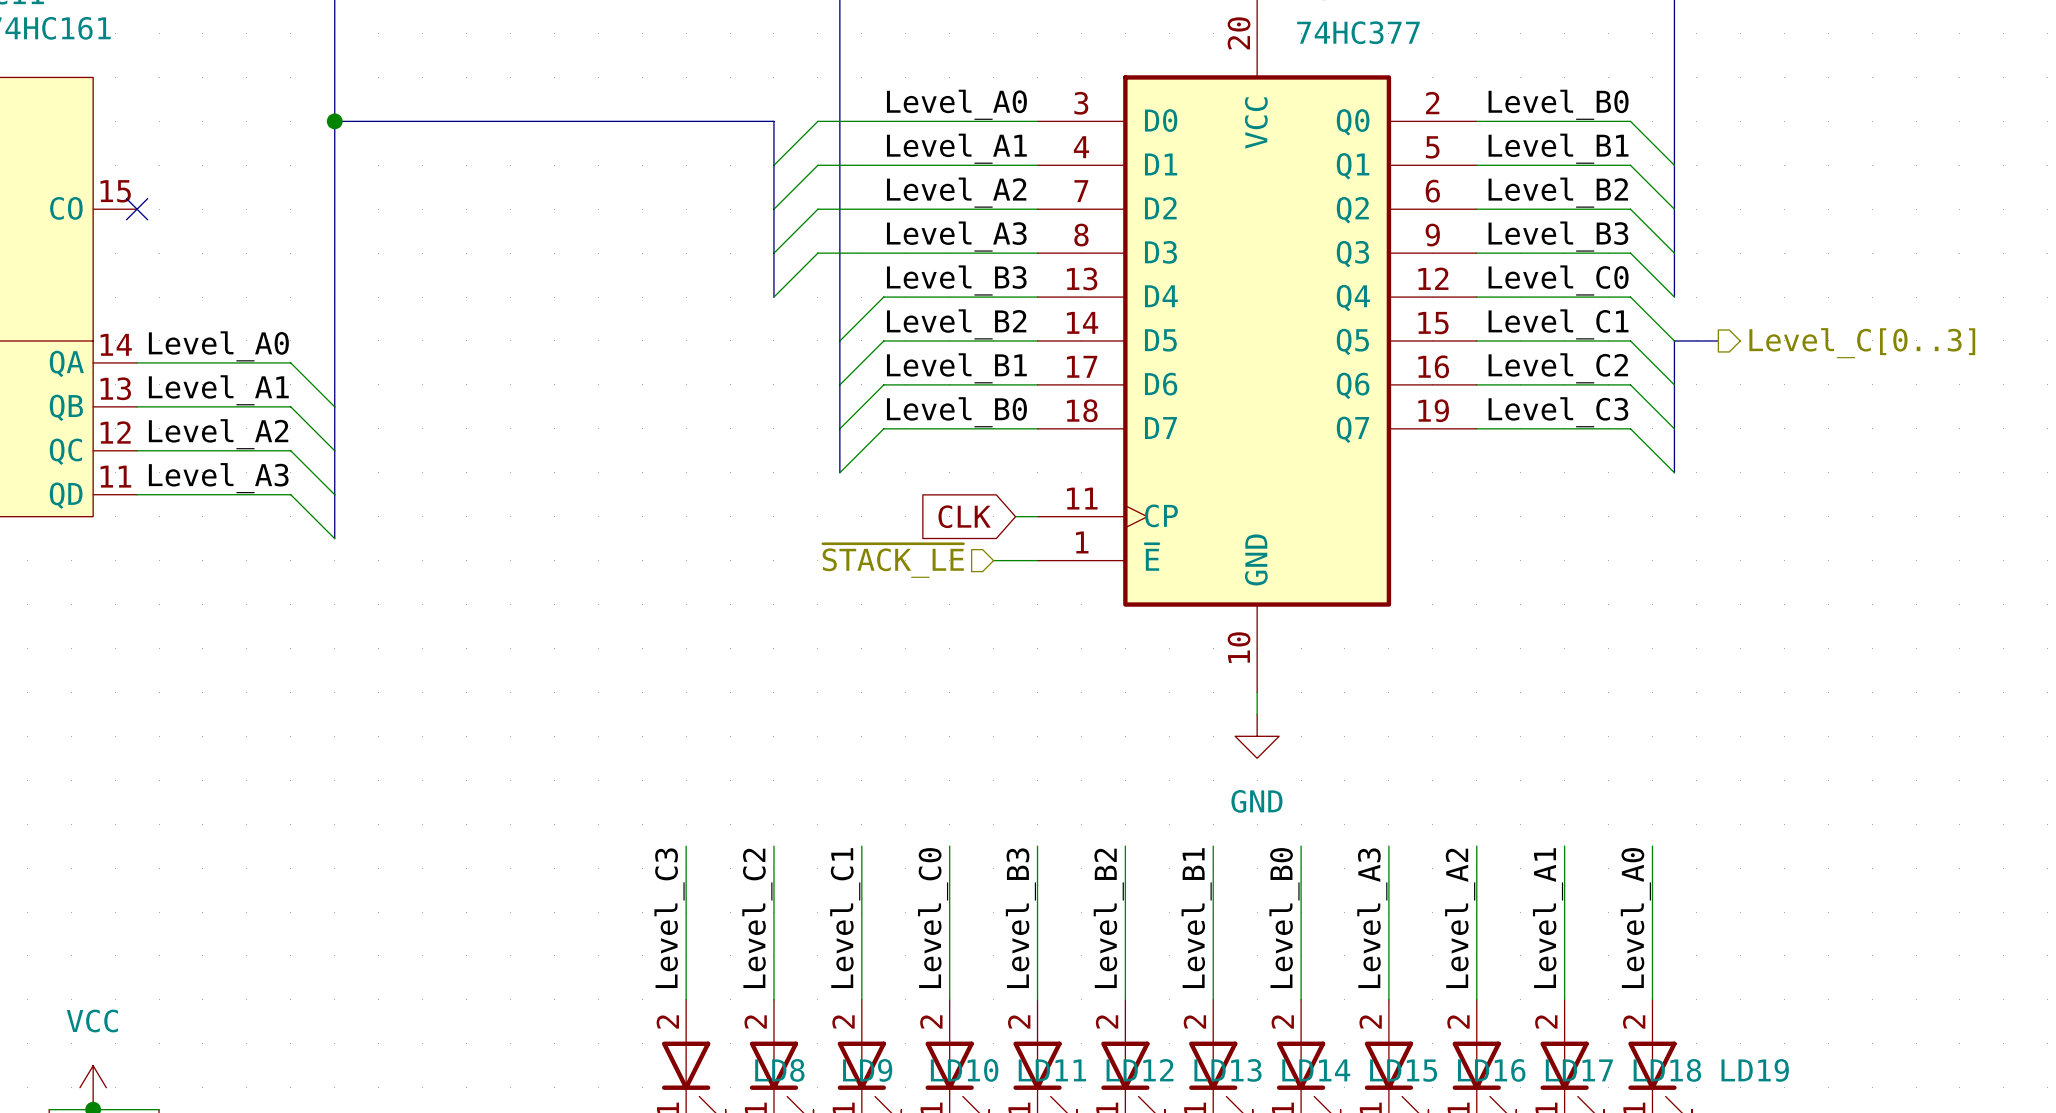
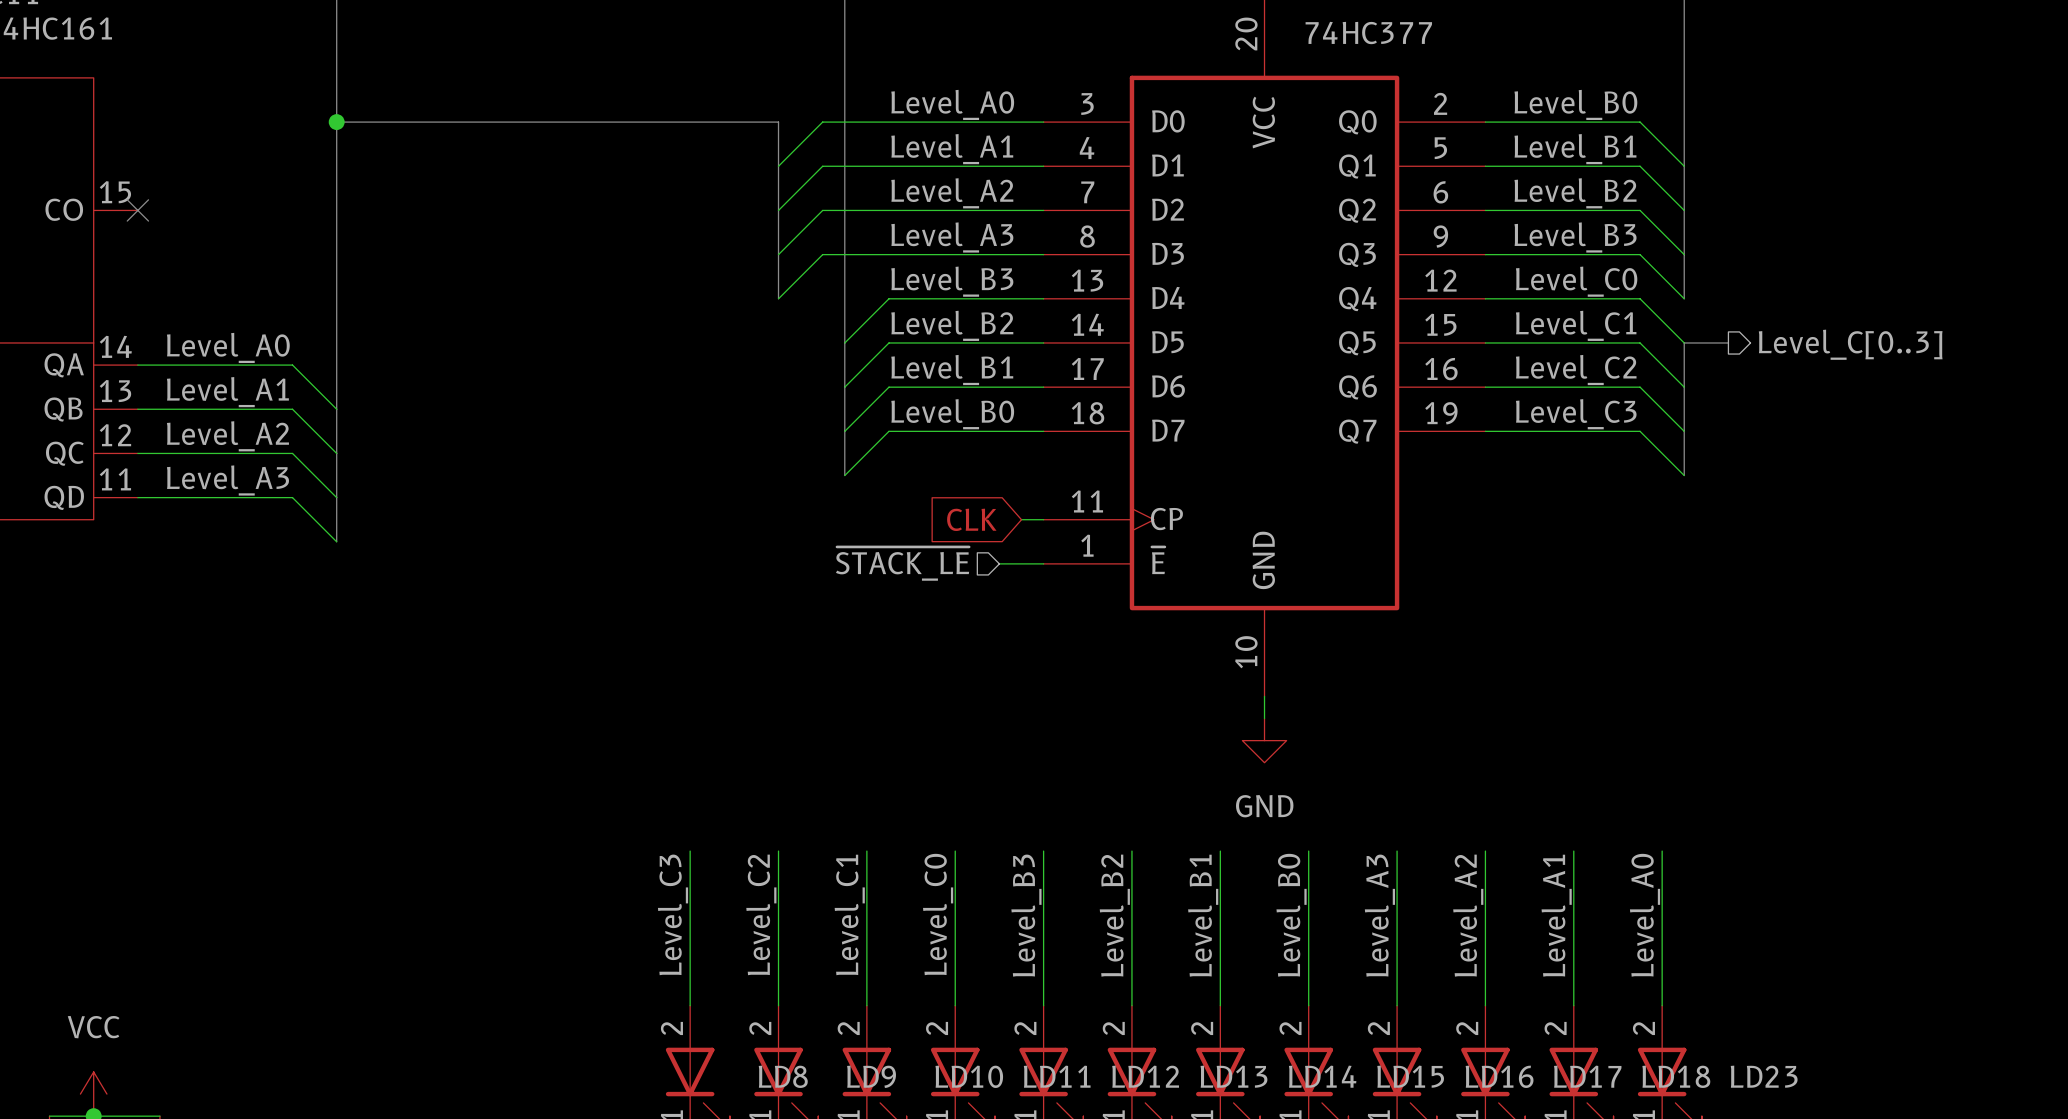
LD19 name: LD19 (1755, 1070) -> LD23 (1764, 1076)

